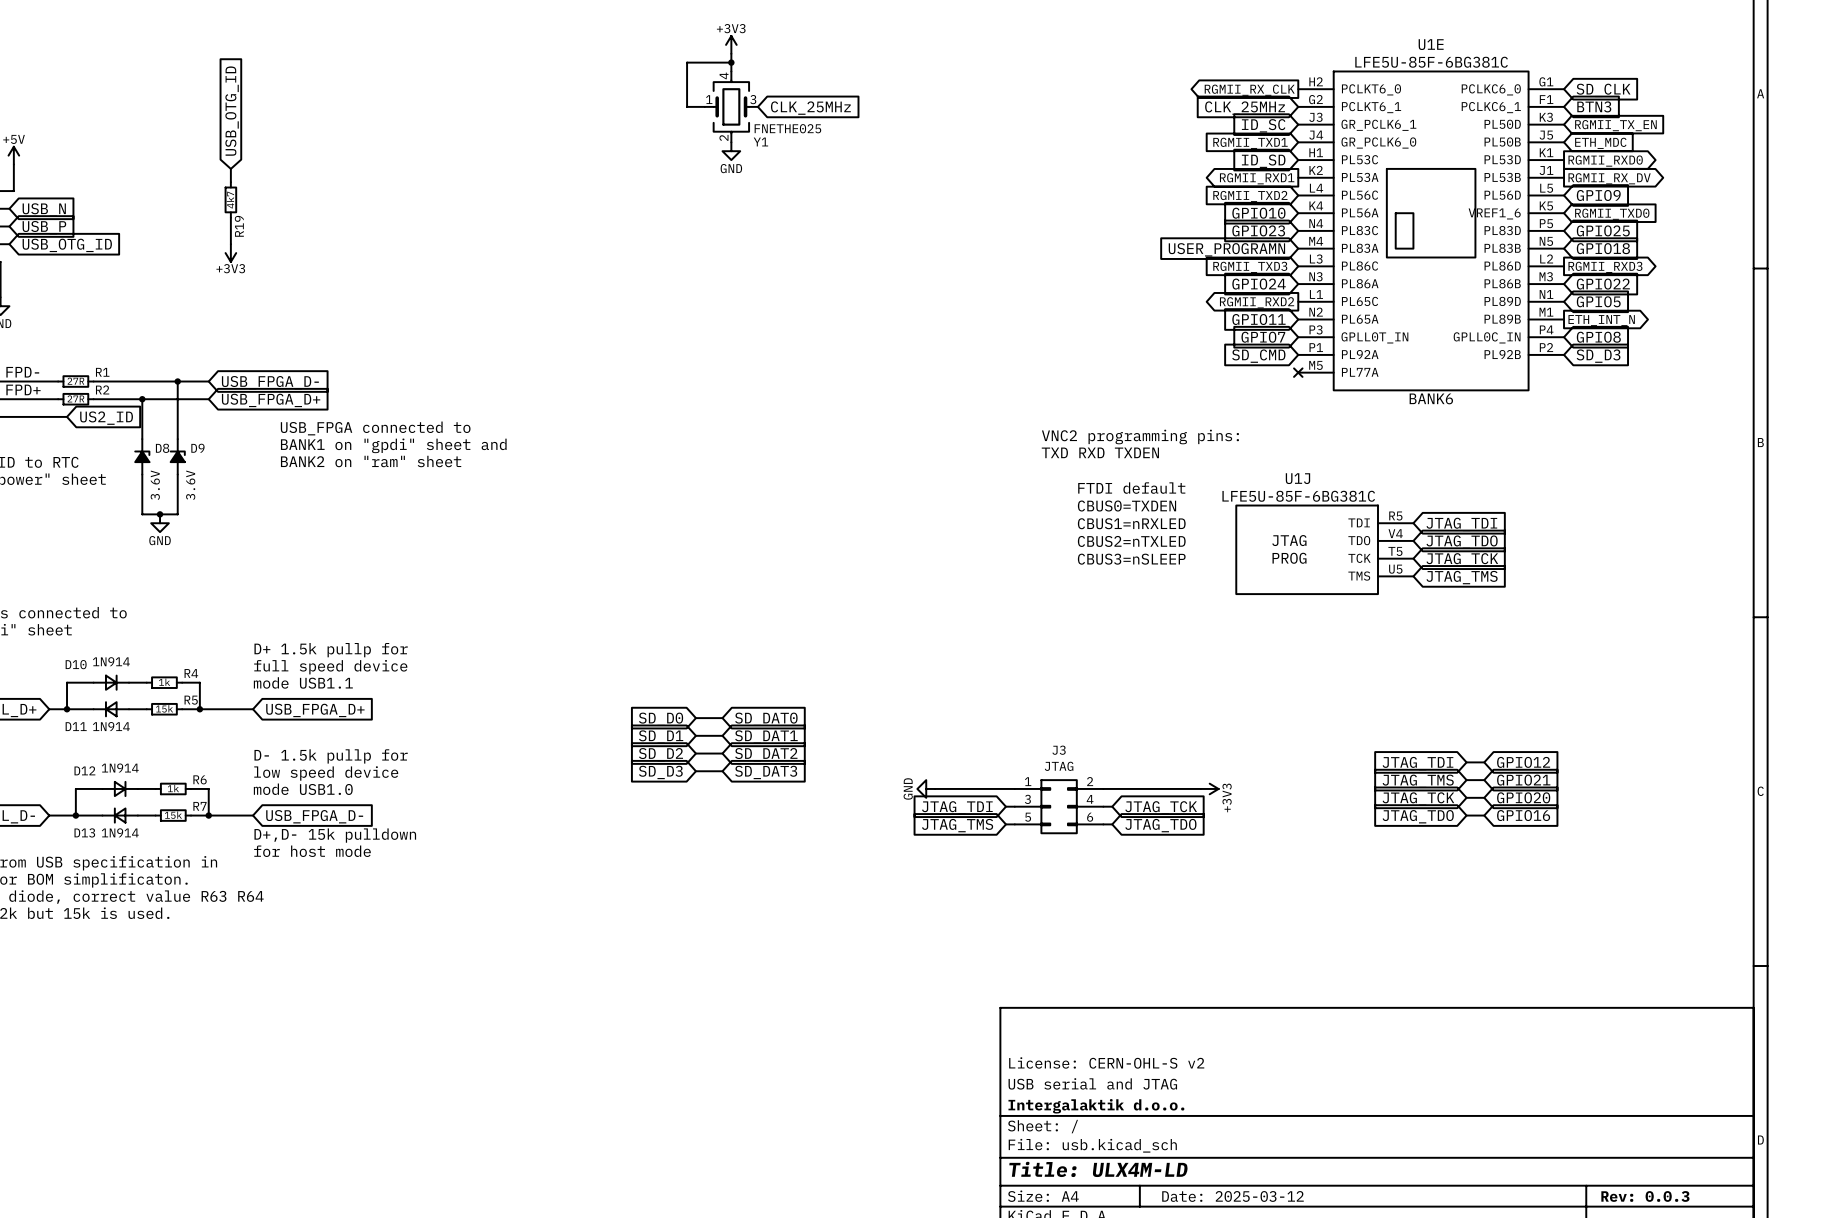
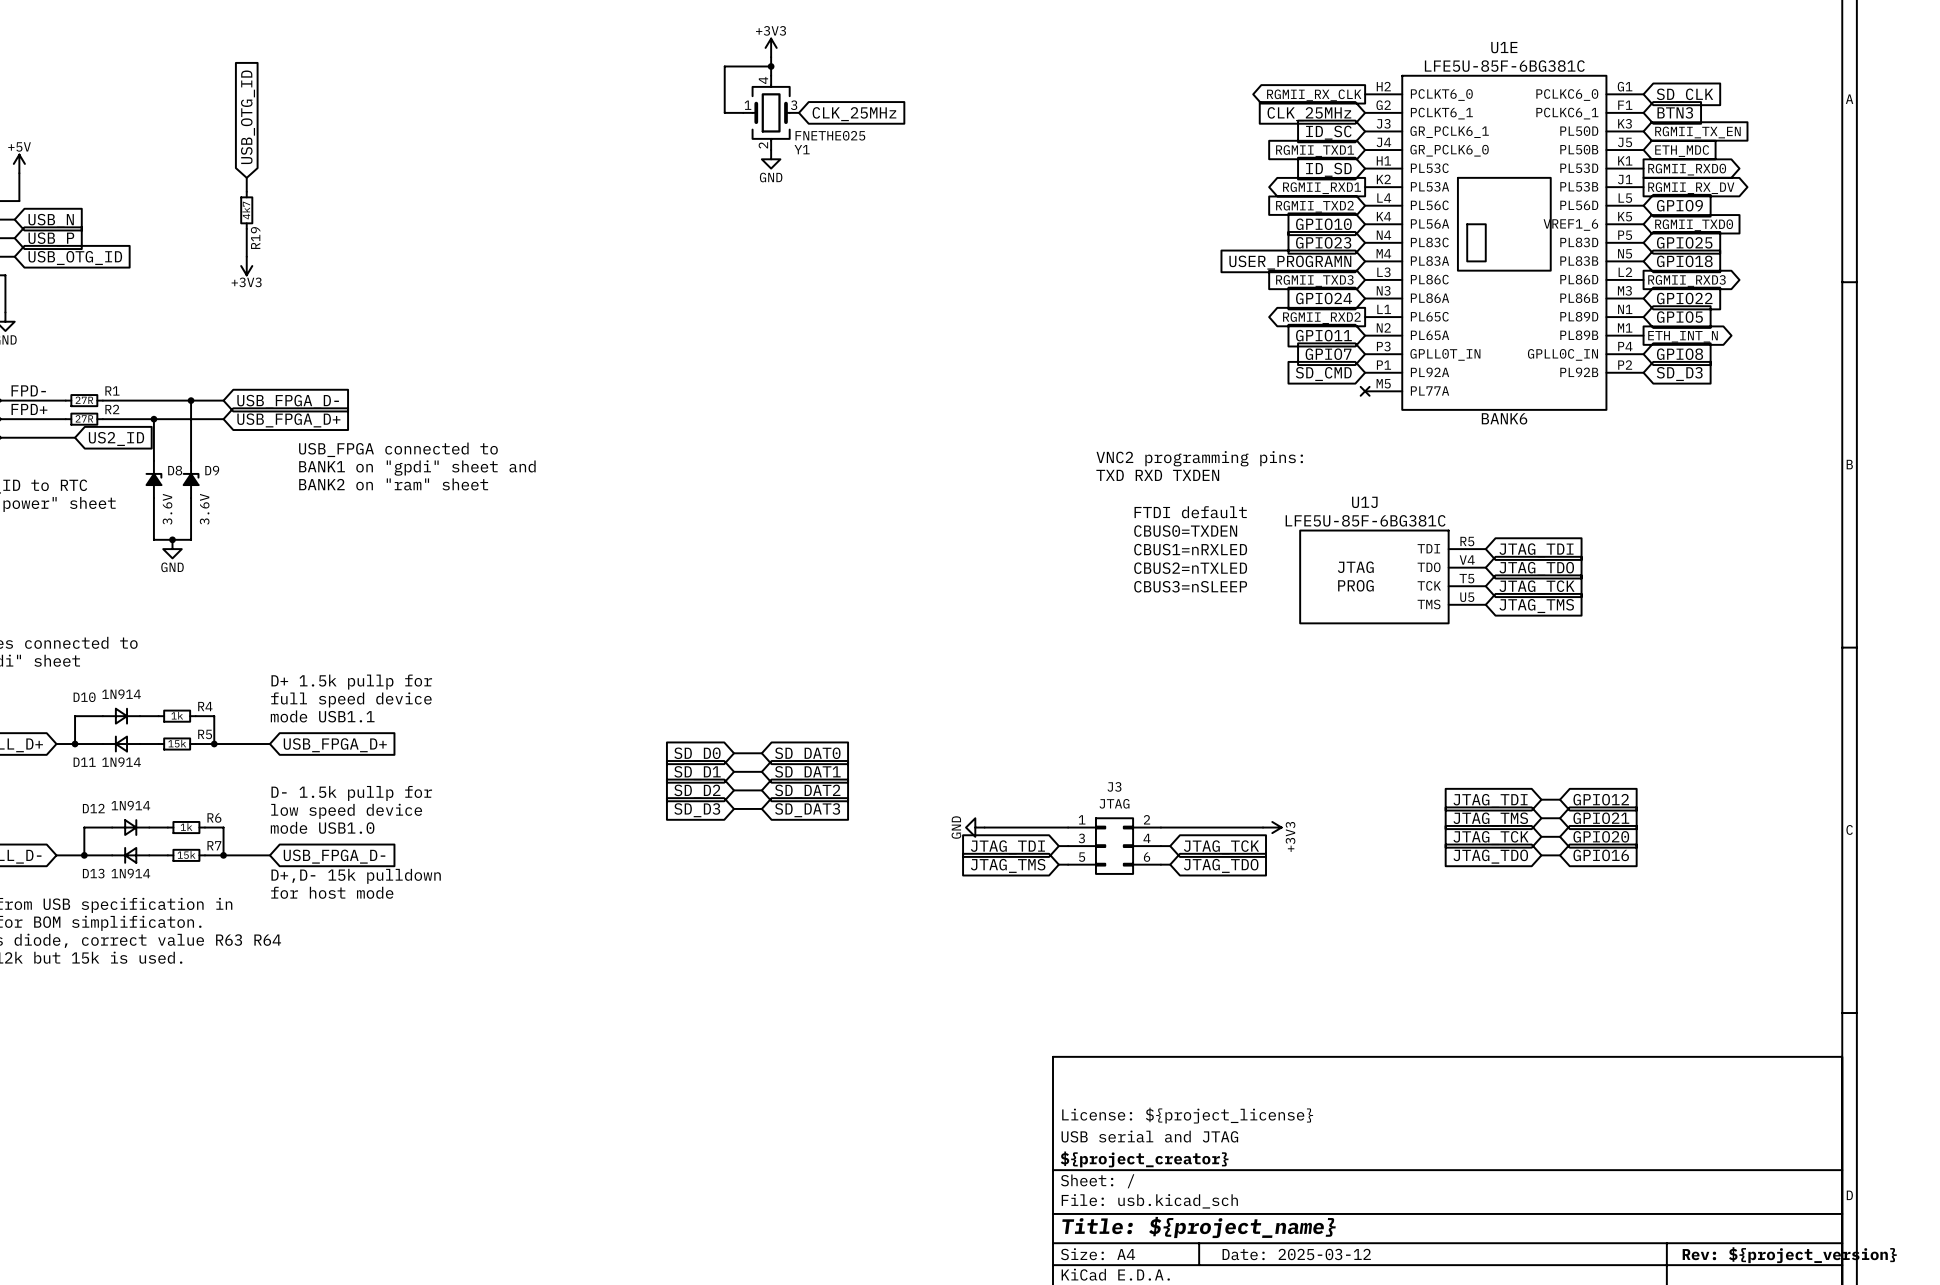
title block: License: CERN-OHL-S v2 (1106, 1062) -> License: ${project_license} (1187, 1115)
title block: Intergalaktik d.o.o. (1096, 1106) -> ${project_creator} (1144, 1159)
title block: Title: ULX4M-LD (1098, 1169) -> Title: ${project_name} (1199, 1227)
title block: Rev: 0.0.3 (1645, 1196) -> Rev: ${project_version} (1789, 1255)

